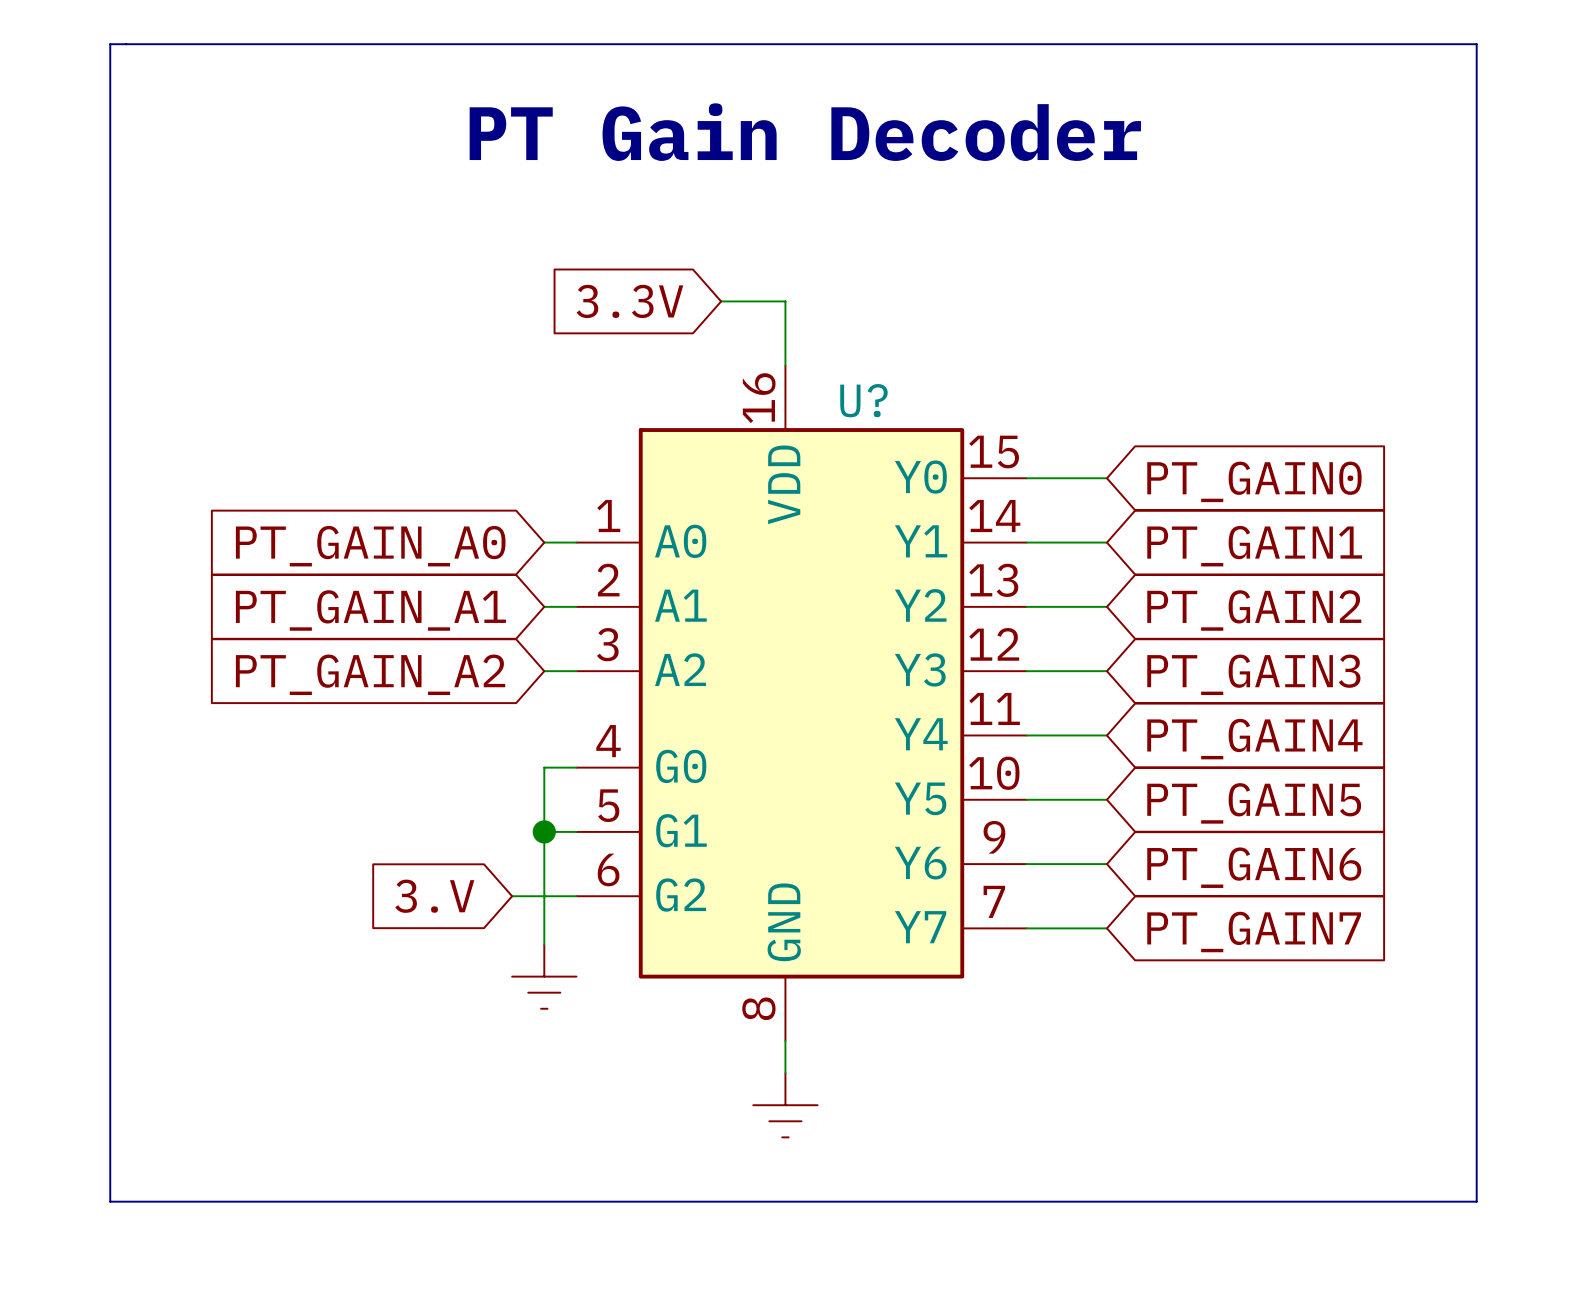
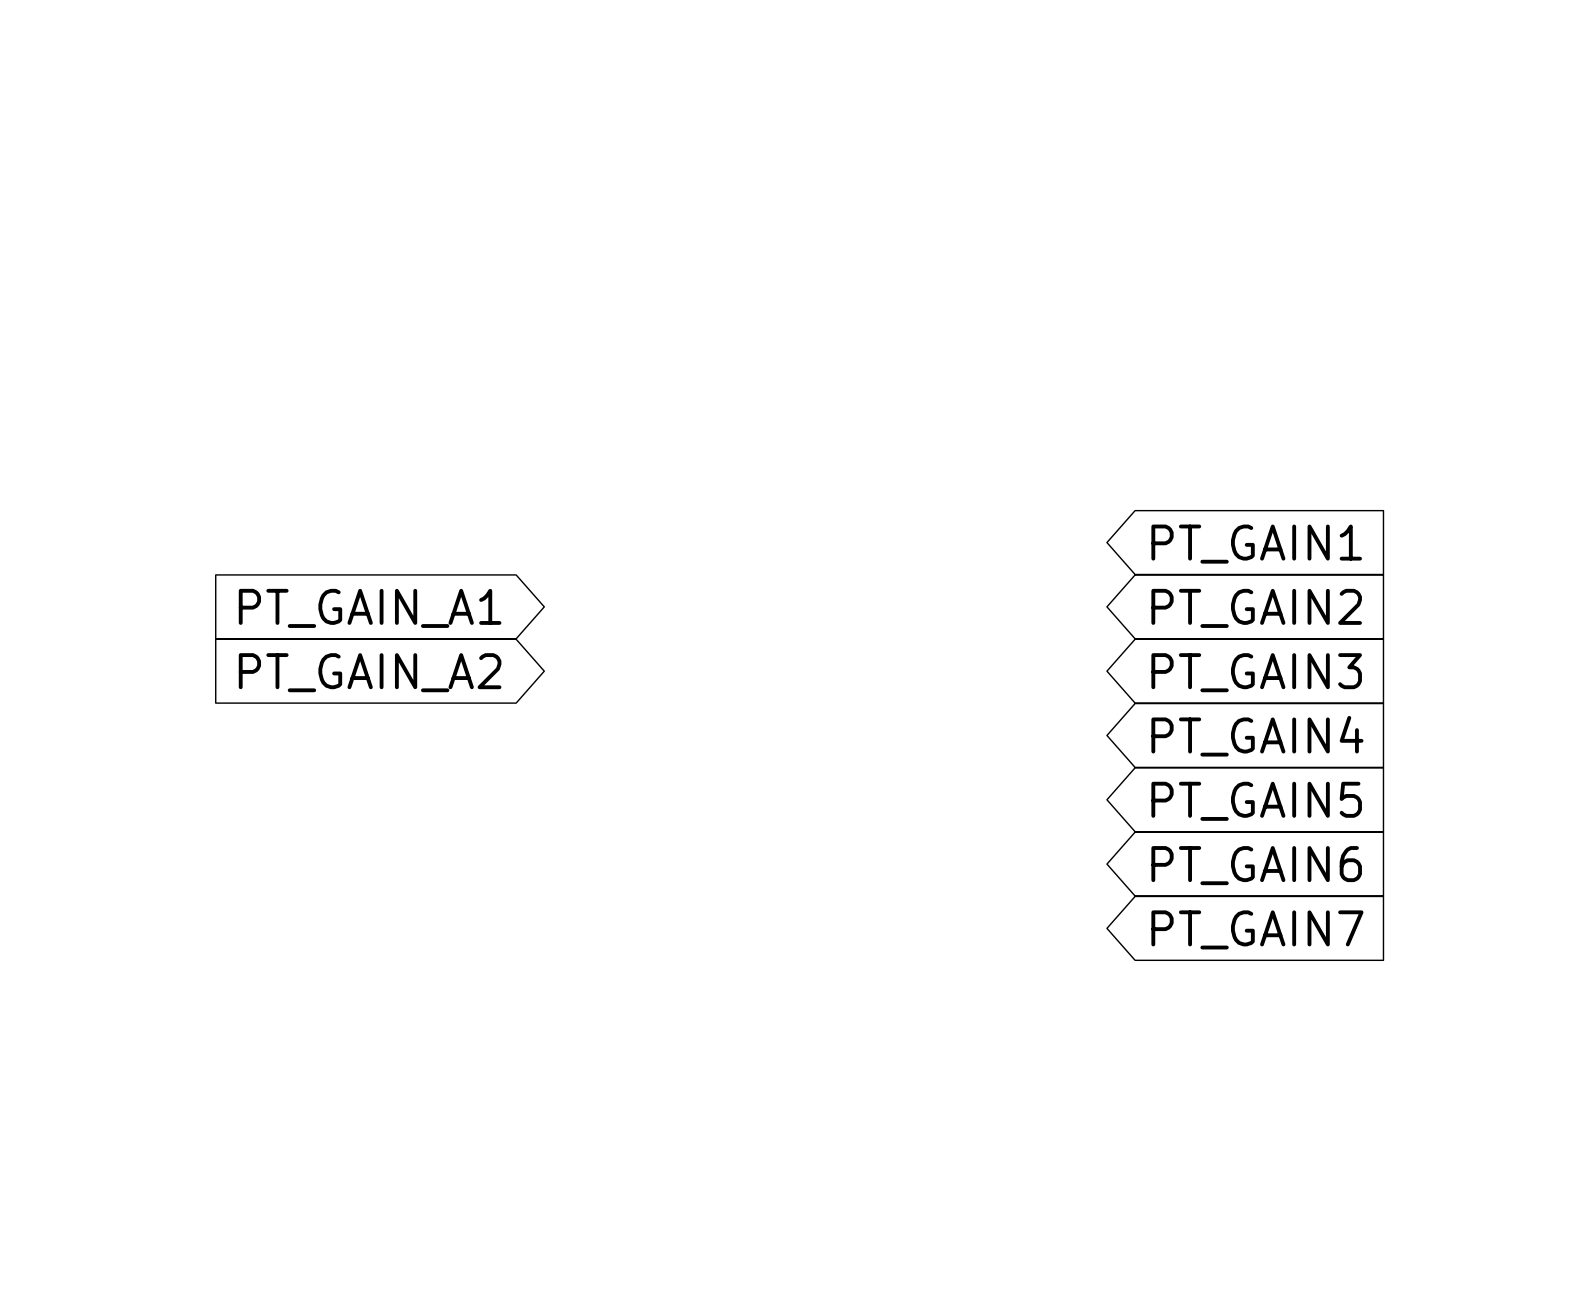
line: (110, 44) (1476, 44) (1476, 1201) (110, 1201) (110, 44) -> none
text: PT Gain Decoder (805, 132) -> none
global label: 3.3V (629, 301) -> none
wire: (721, 301) (785, 301) (785, 365) -> none
wire: (1026, 478) (1106, 478) -> none
global label: PT_GAIN0 (1254, 481) -> none
wire: (544, 542) (576, 542) -> none
wire: (1026, 542) (1106, 542) -> none
global label: PT_GAIN_A0 (370, 546) -> none
wire: (544, 606) (576, 606) -> none
wire: (1026, 606) (1106, 606) -> none
wire: (544, 671) (576, 671) -> none
wire: (1026, 671) (1106, 671) -> none
U?: (801, 703) -> none
wire: (1026, 735) (1106, 735) -> none
wire: (576, 767) (544, 767) (544, 944) -> none
wire: (1026, 799) (1106, 799) -> none
wire: (544, 831) (576, 831) -> none
junction: (544, 831) -> none
wire: (1026, 864) (1106, 864) -> none
global label: 3.V (434, 896) -> none
wire: (512, 896) (576, 896) -> none
wire: (1026, 928) (1106, 928) -> none
power symbol: (544, 976) -> none
wire: (785, 1040) (785, 1073) -> none
power symbol: (785, 1105) -> none

